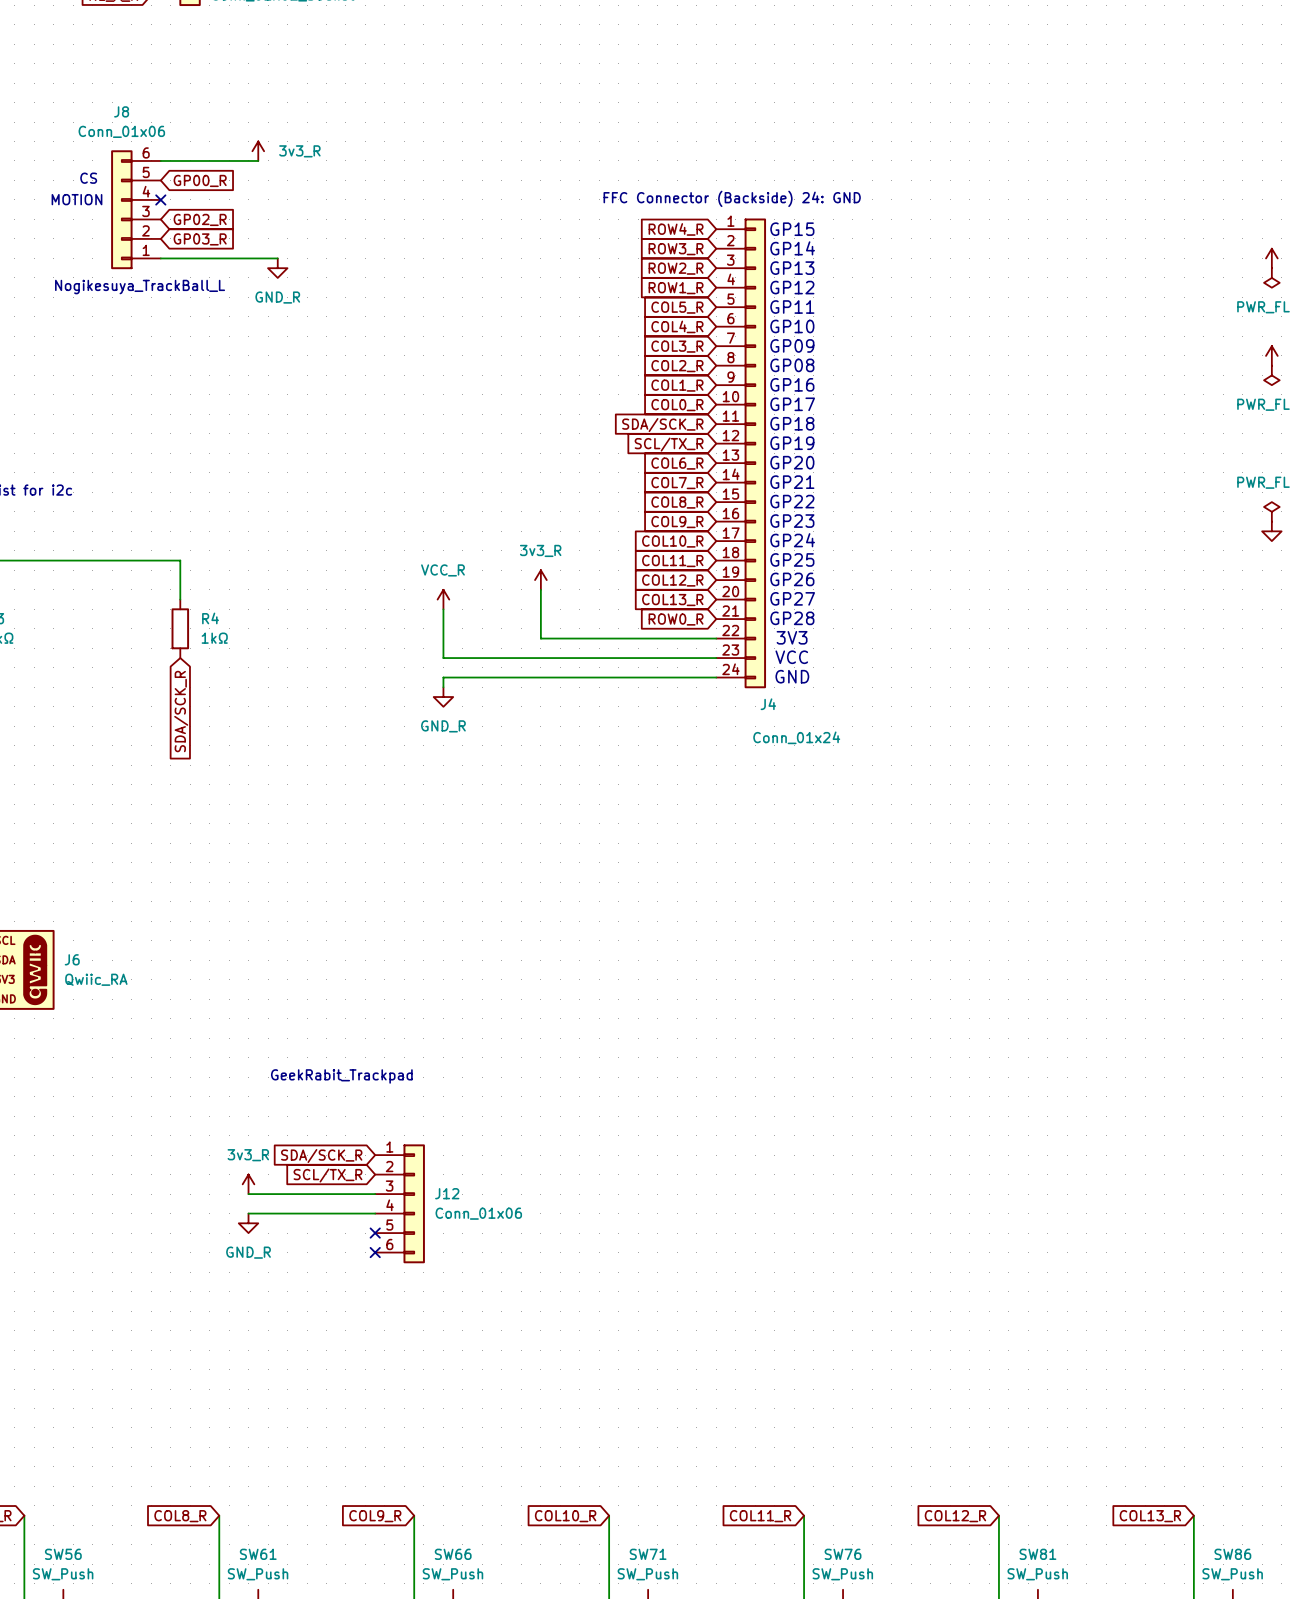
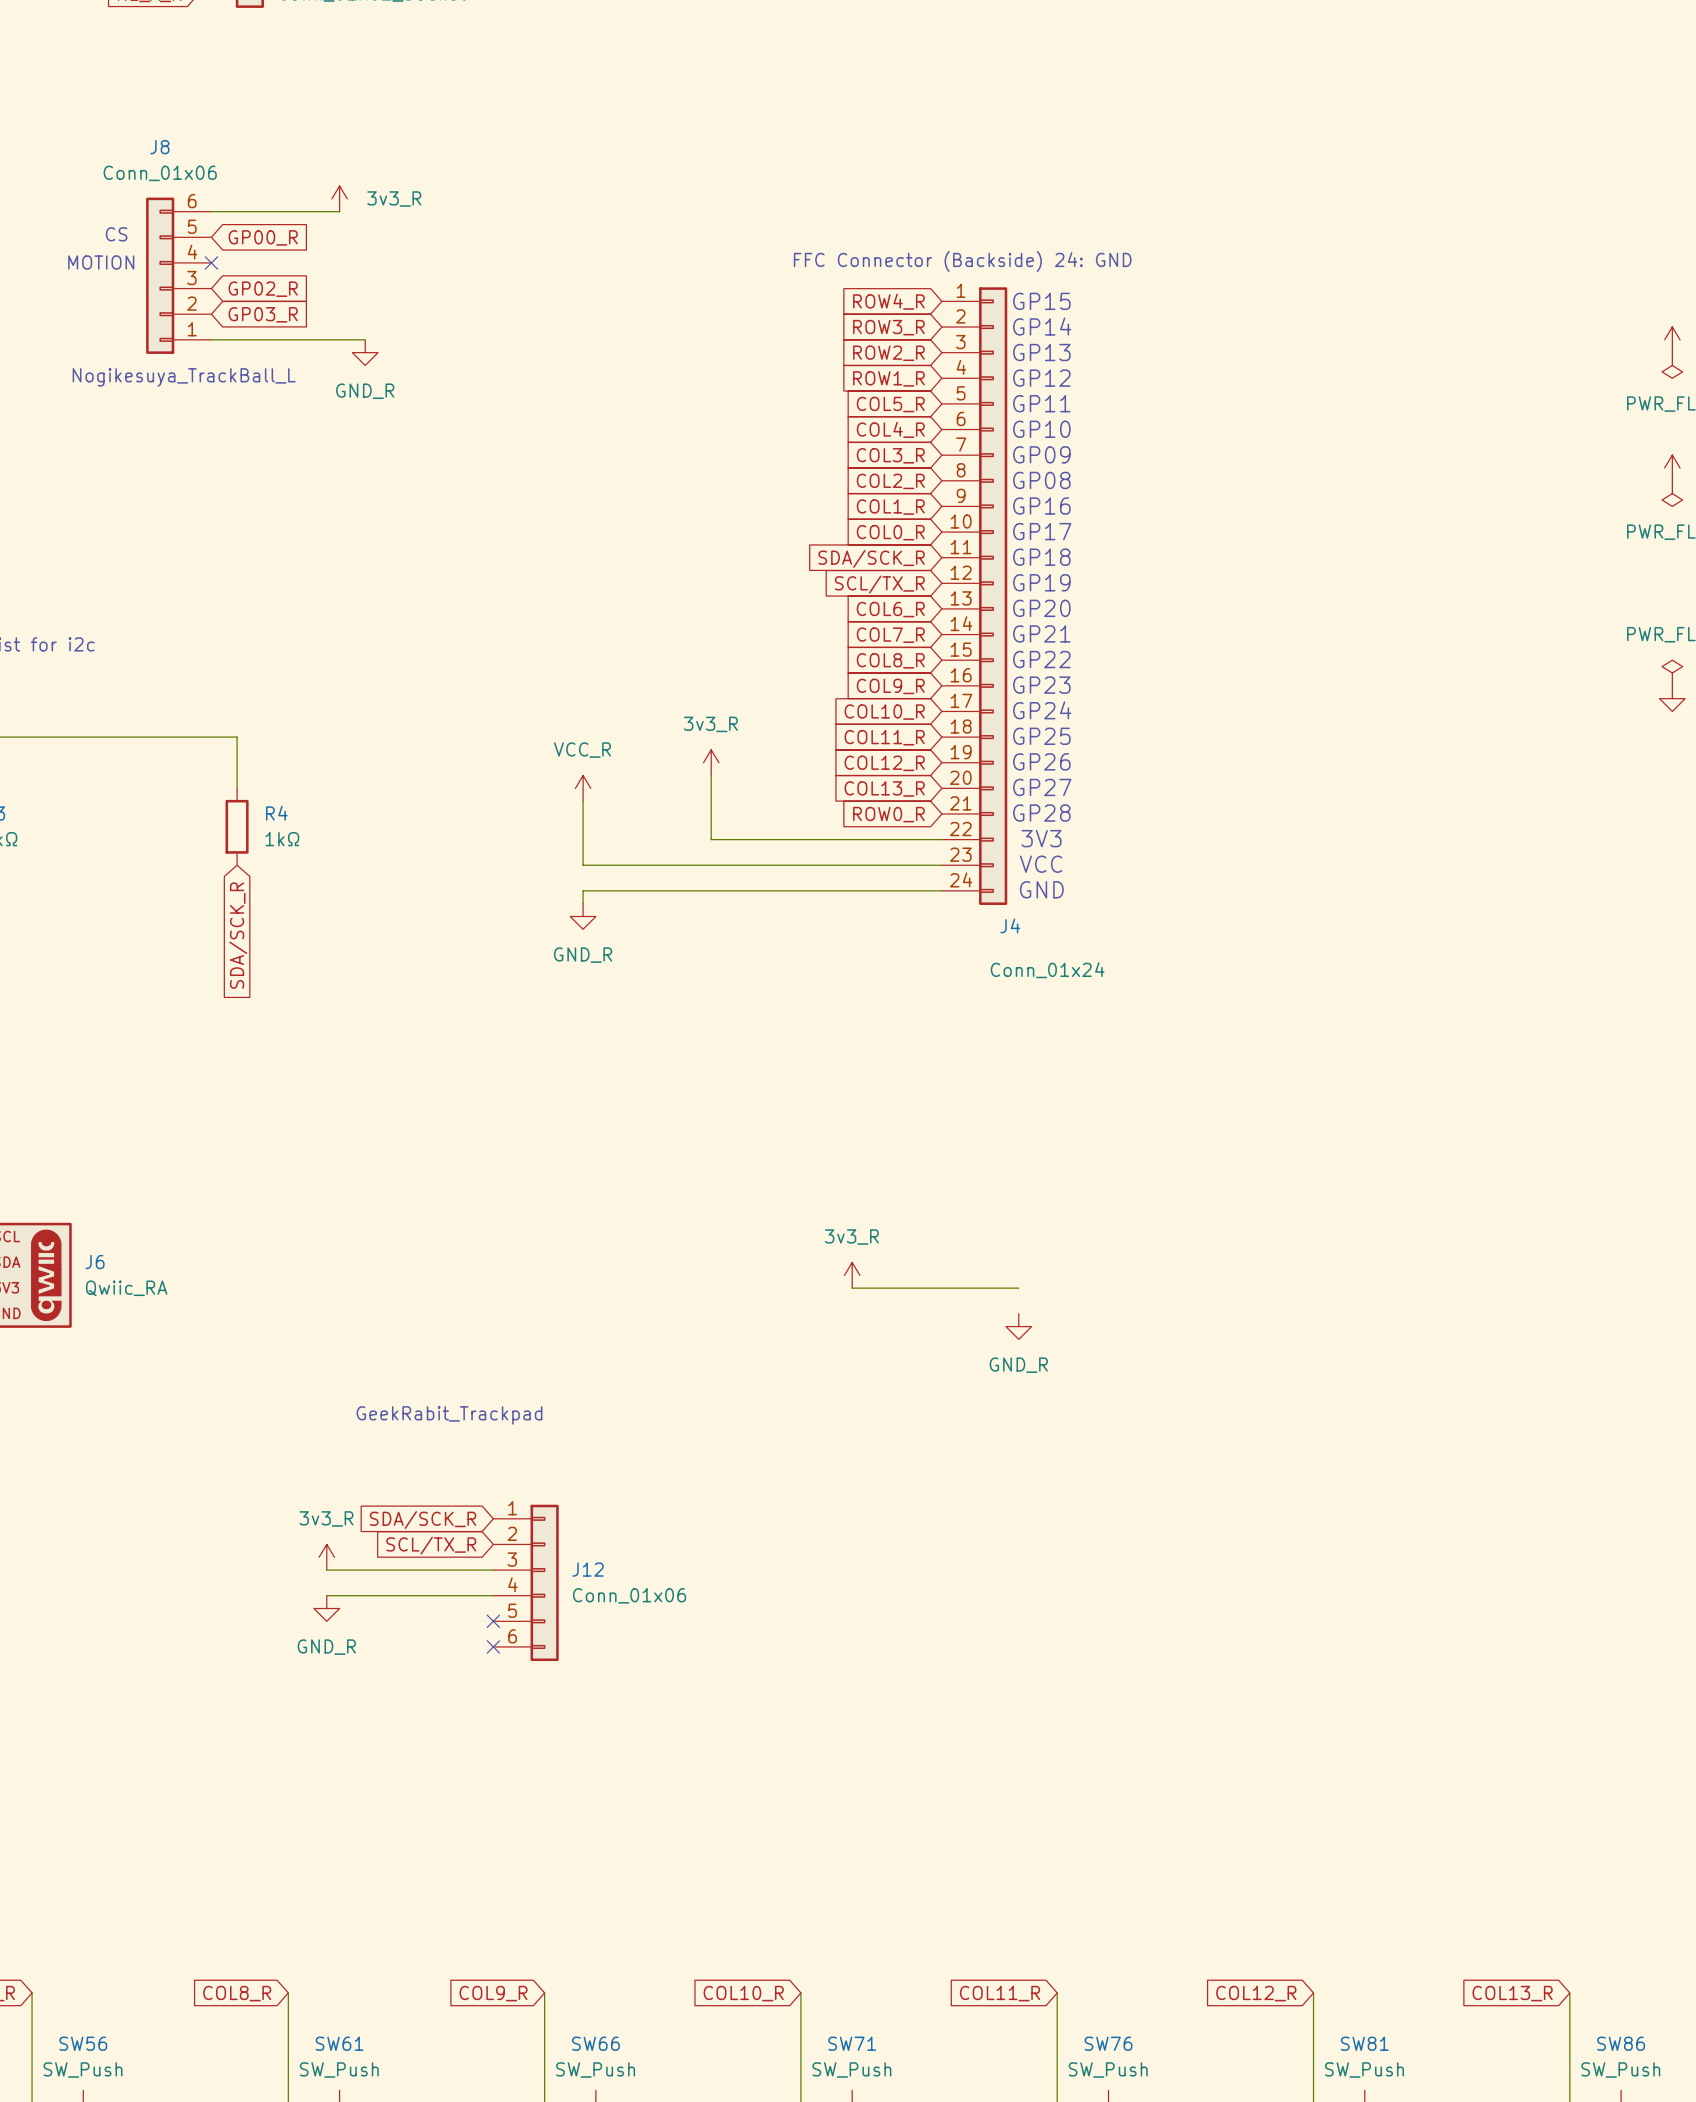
power symbol: none -> 3v3_R (852, 1275)
wire: none -> (852, 1288) (1018, 1288)
power symbol: none -> GND_R (1018, 1326)

